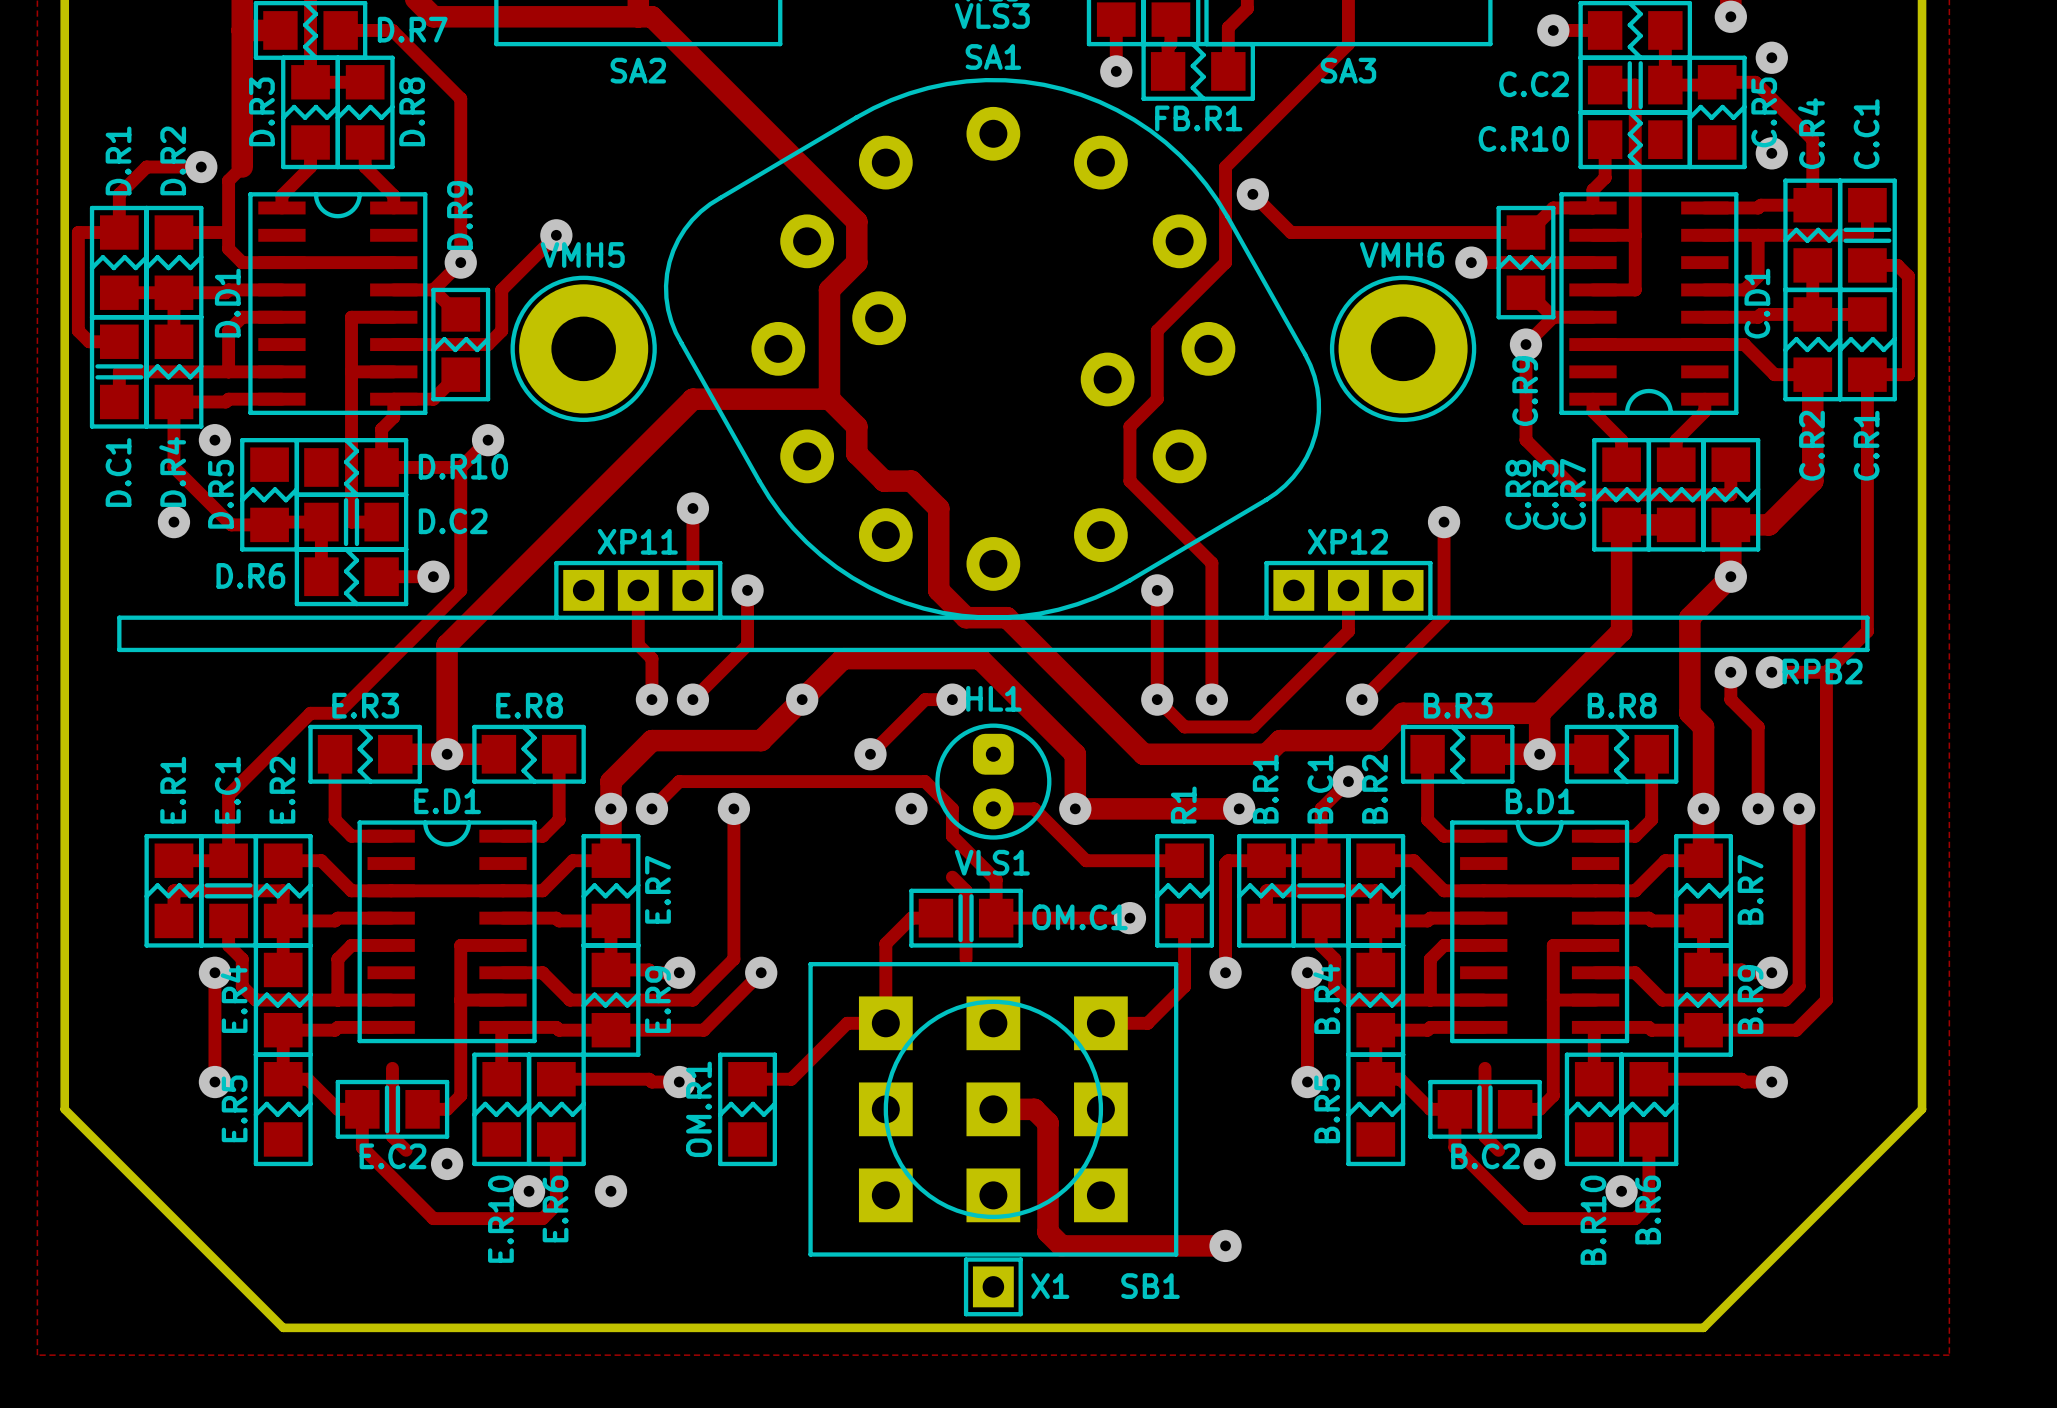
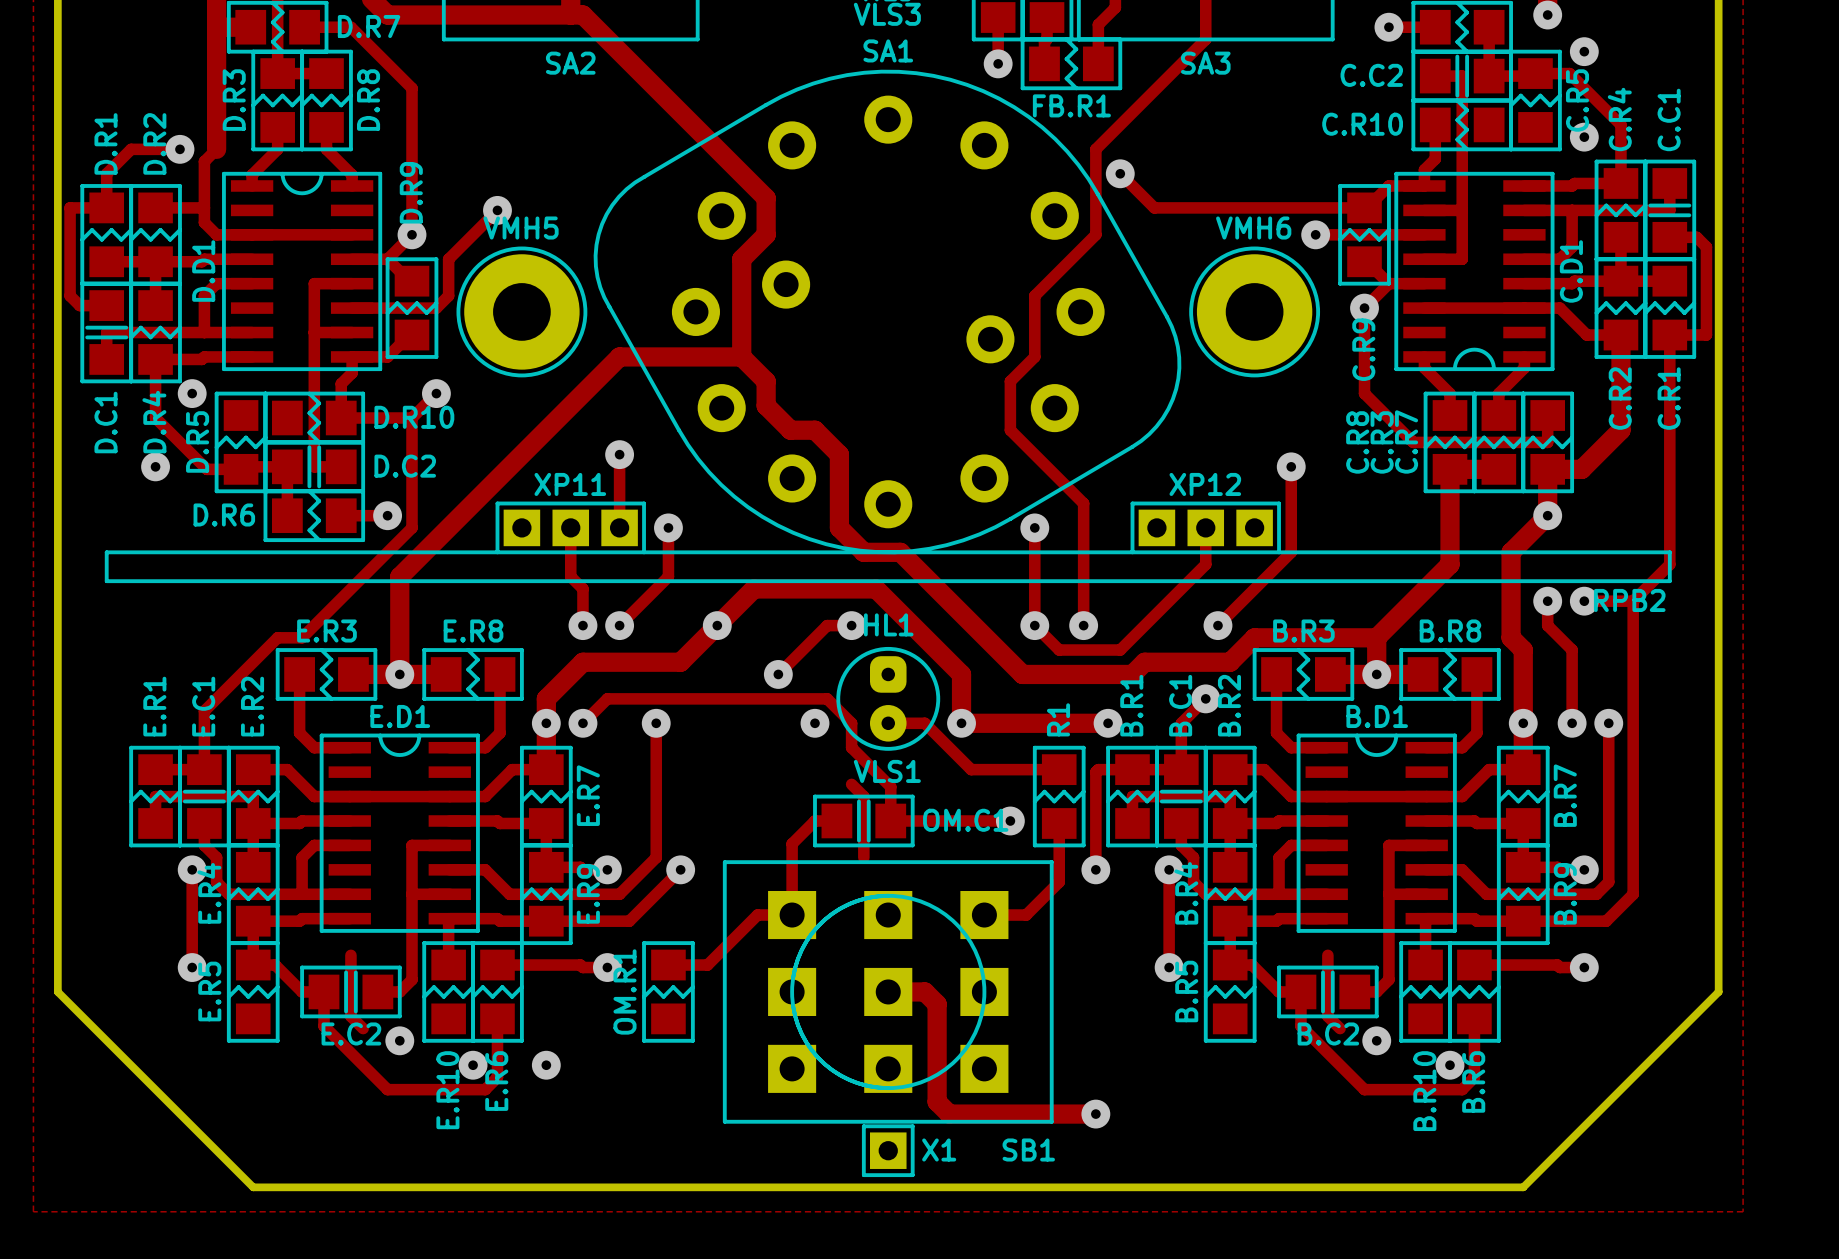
SB1 footprint: [808, 962, 1179, 1257] -> [722, 860, 1054, 1124]

